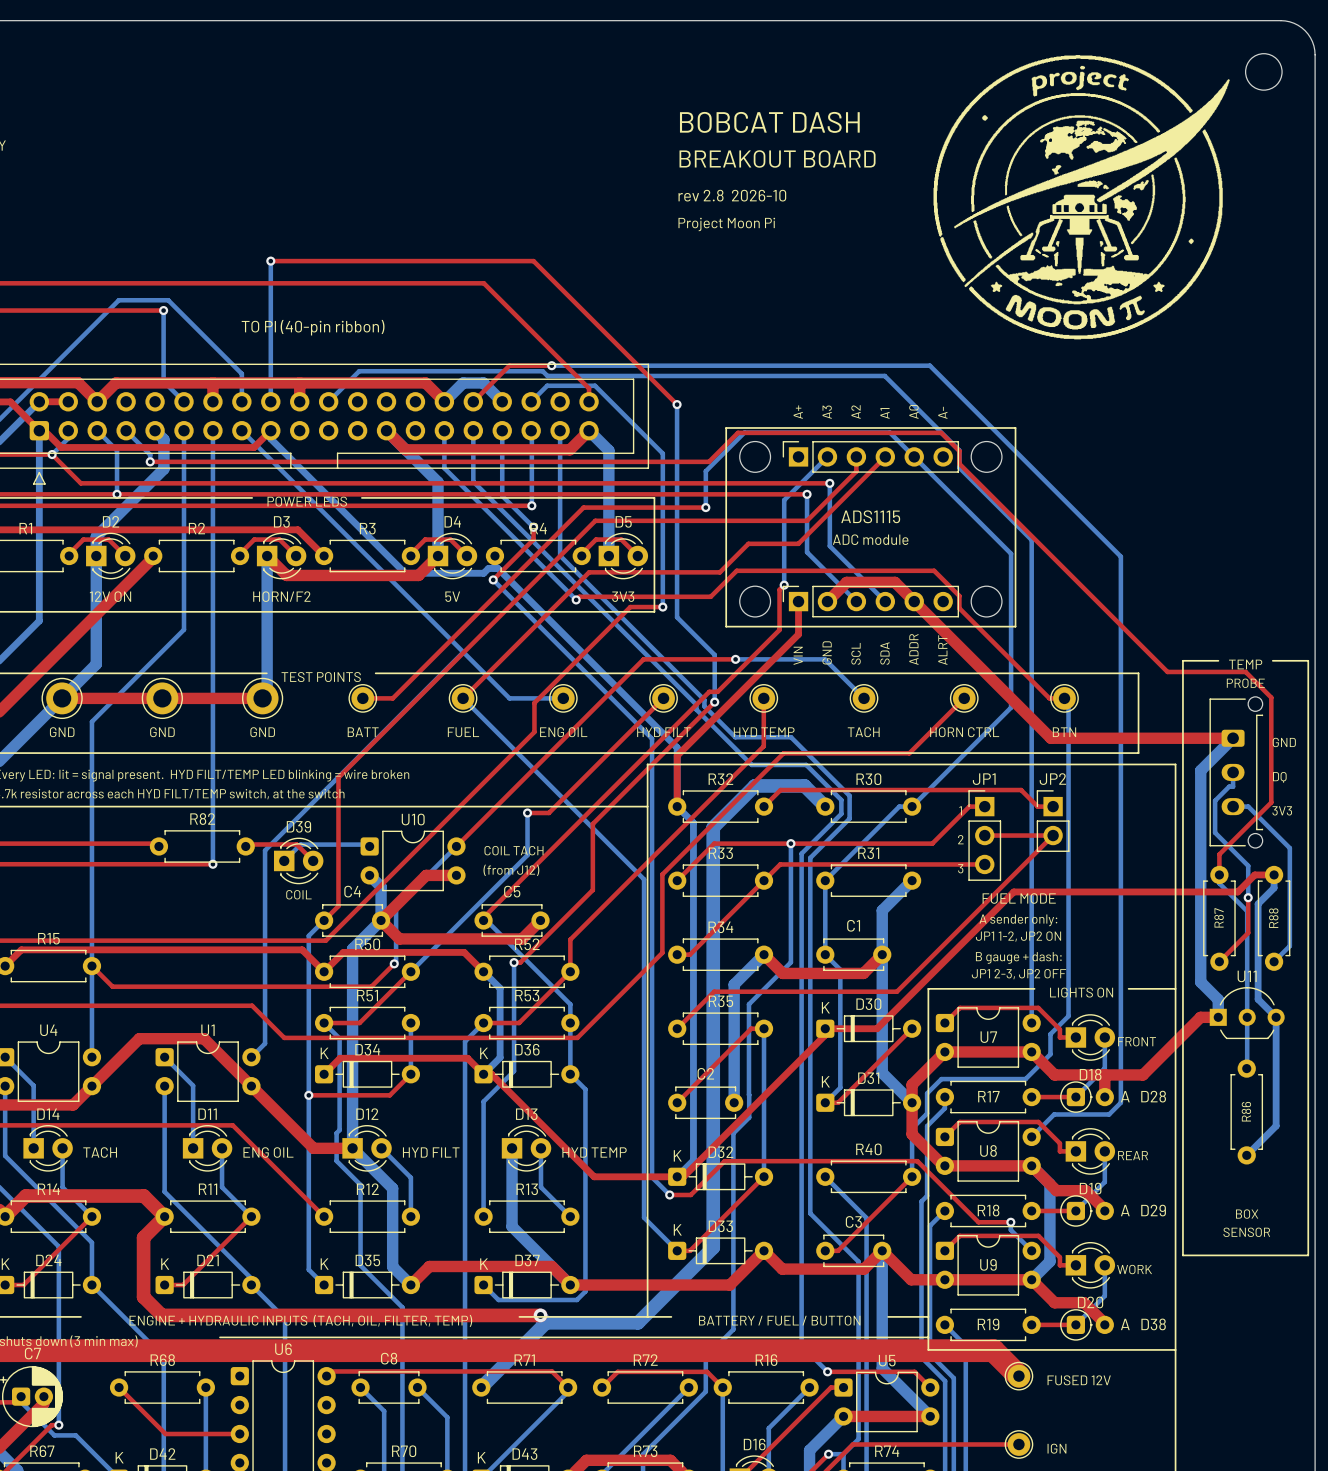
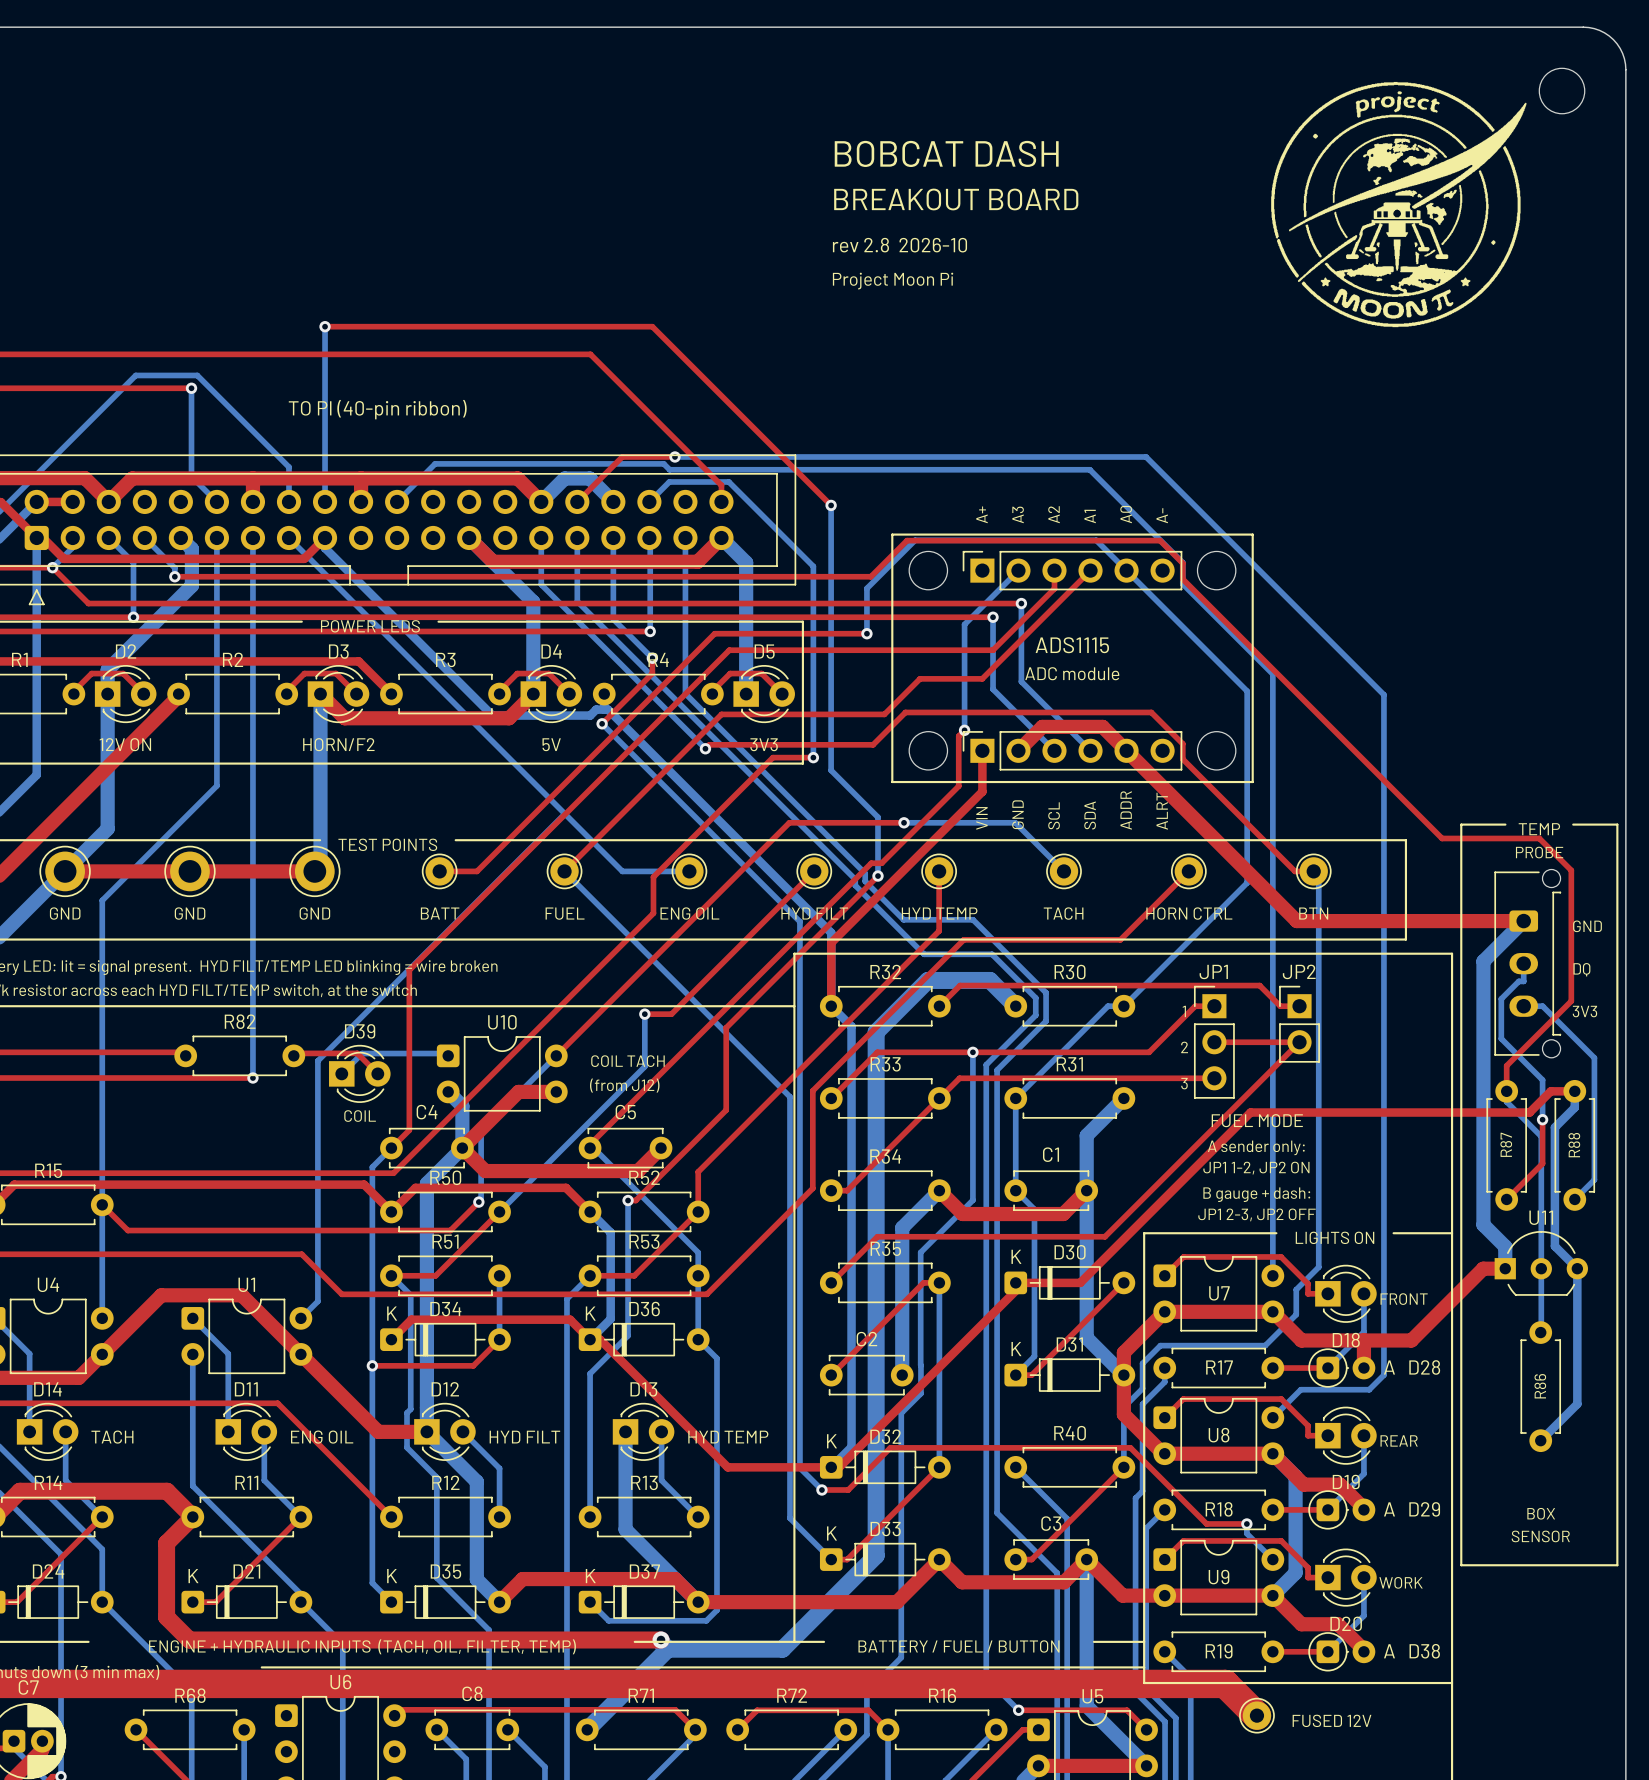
drawing: [933, 55, 1230, 340] -> none
drawing: none -> [1271, 81, 1527, 328]
drawing shape: [1118, 74, 1129, 91] -> [1380, 96, 1395, 108]
drawing shape: [1130, 174, 1156, 245] -> [1415, 251, 1420, 265]
drawing shape: [1077, 180, 1103, 189] -> [1334, 211, 1348, 239]
drawing shape: [1052, 194, 1107, 215] -> [1297, 235, 1358, 283]

